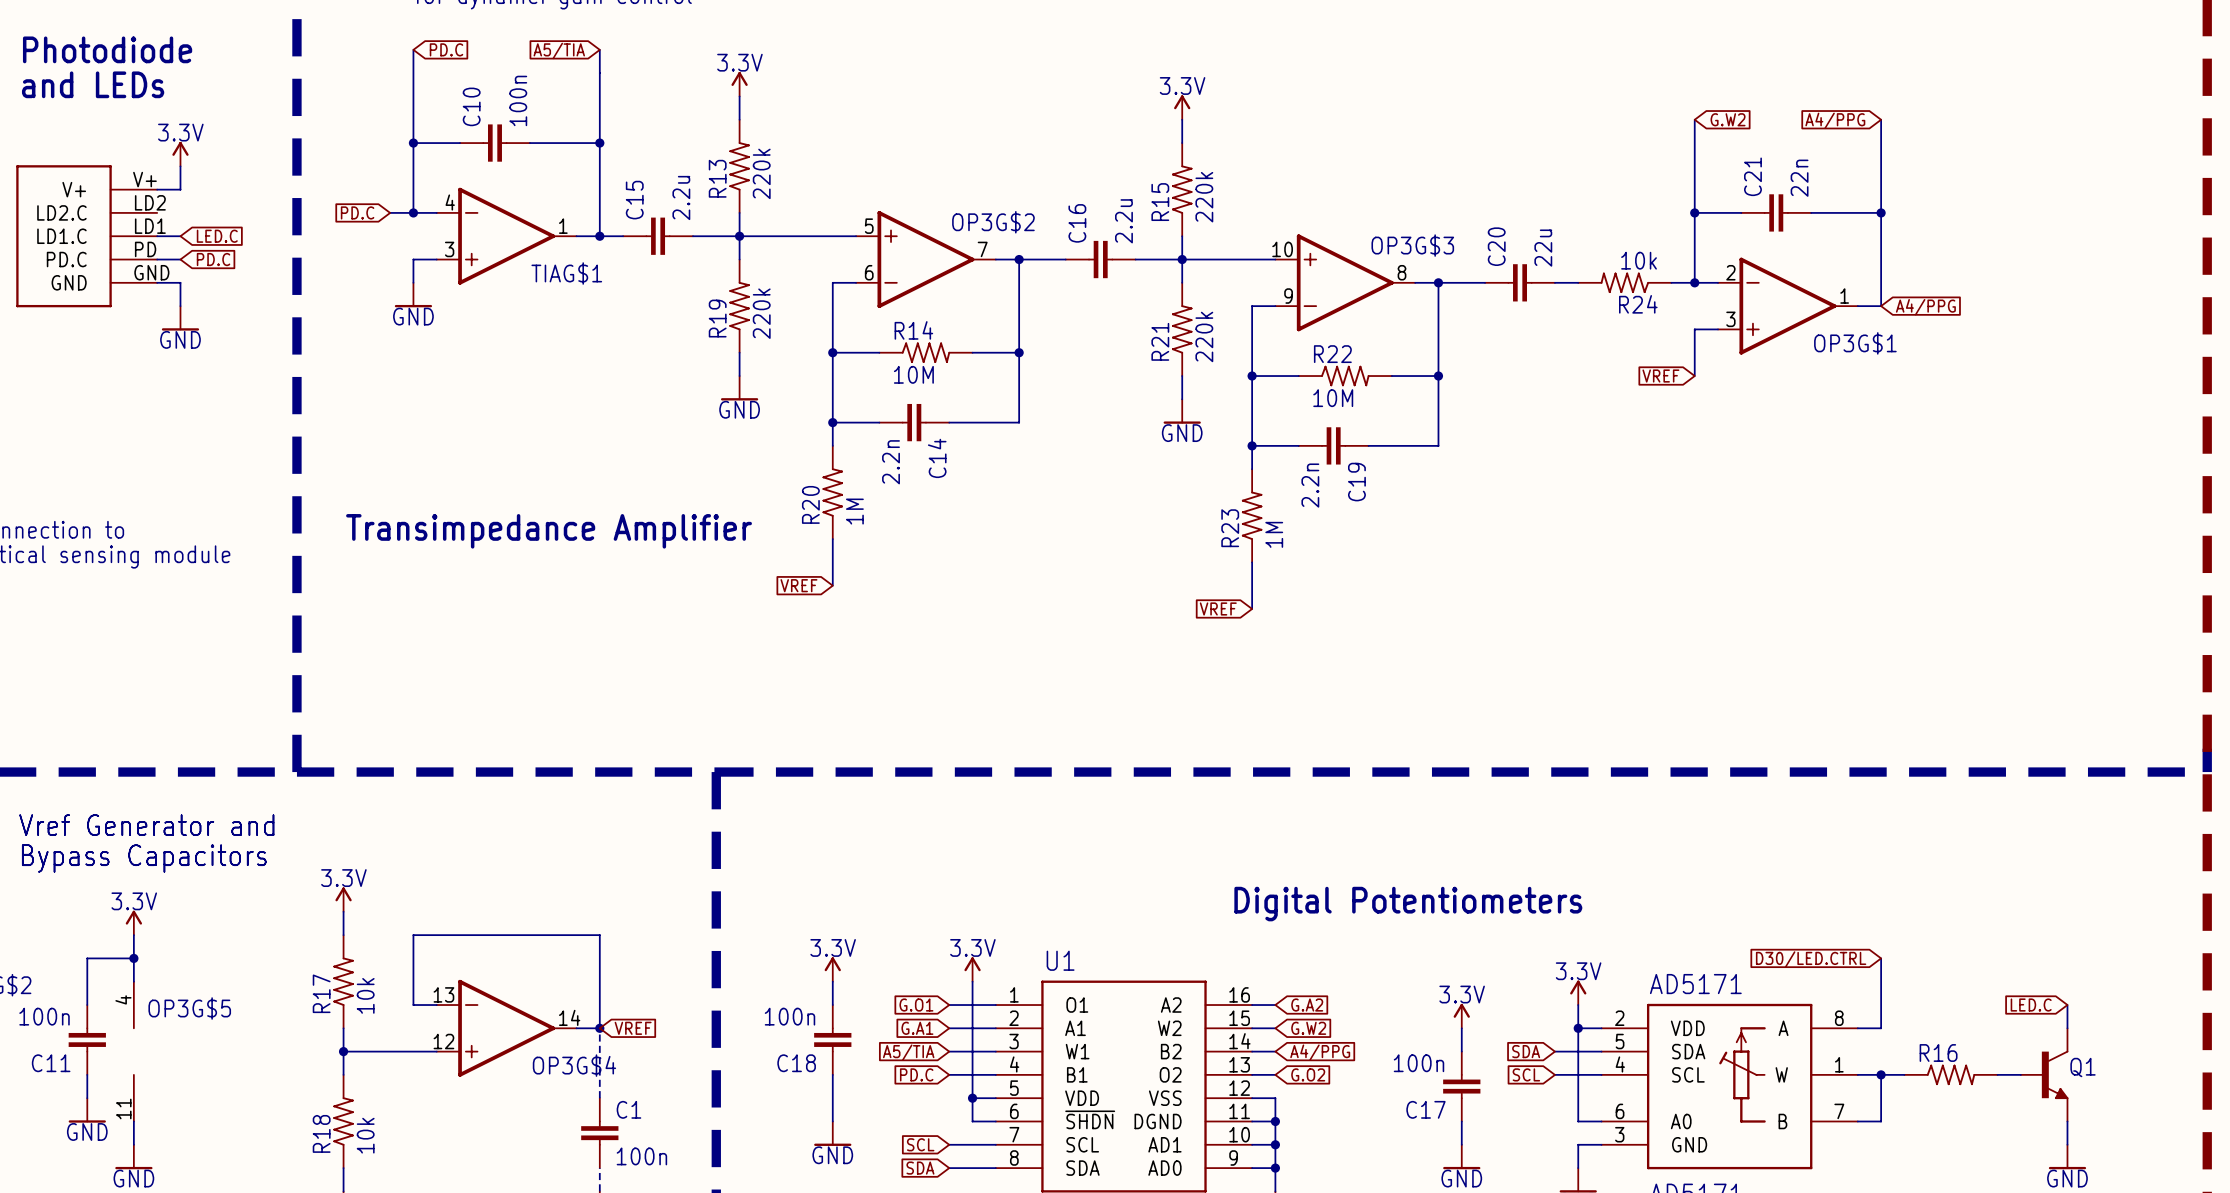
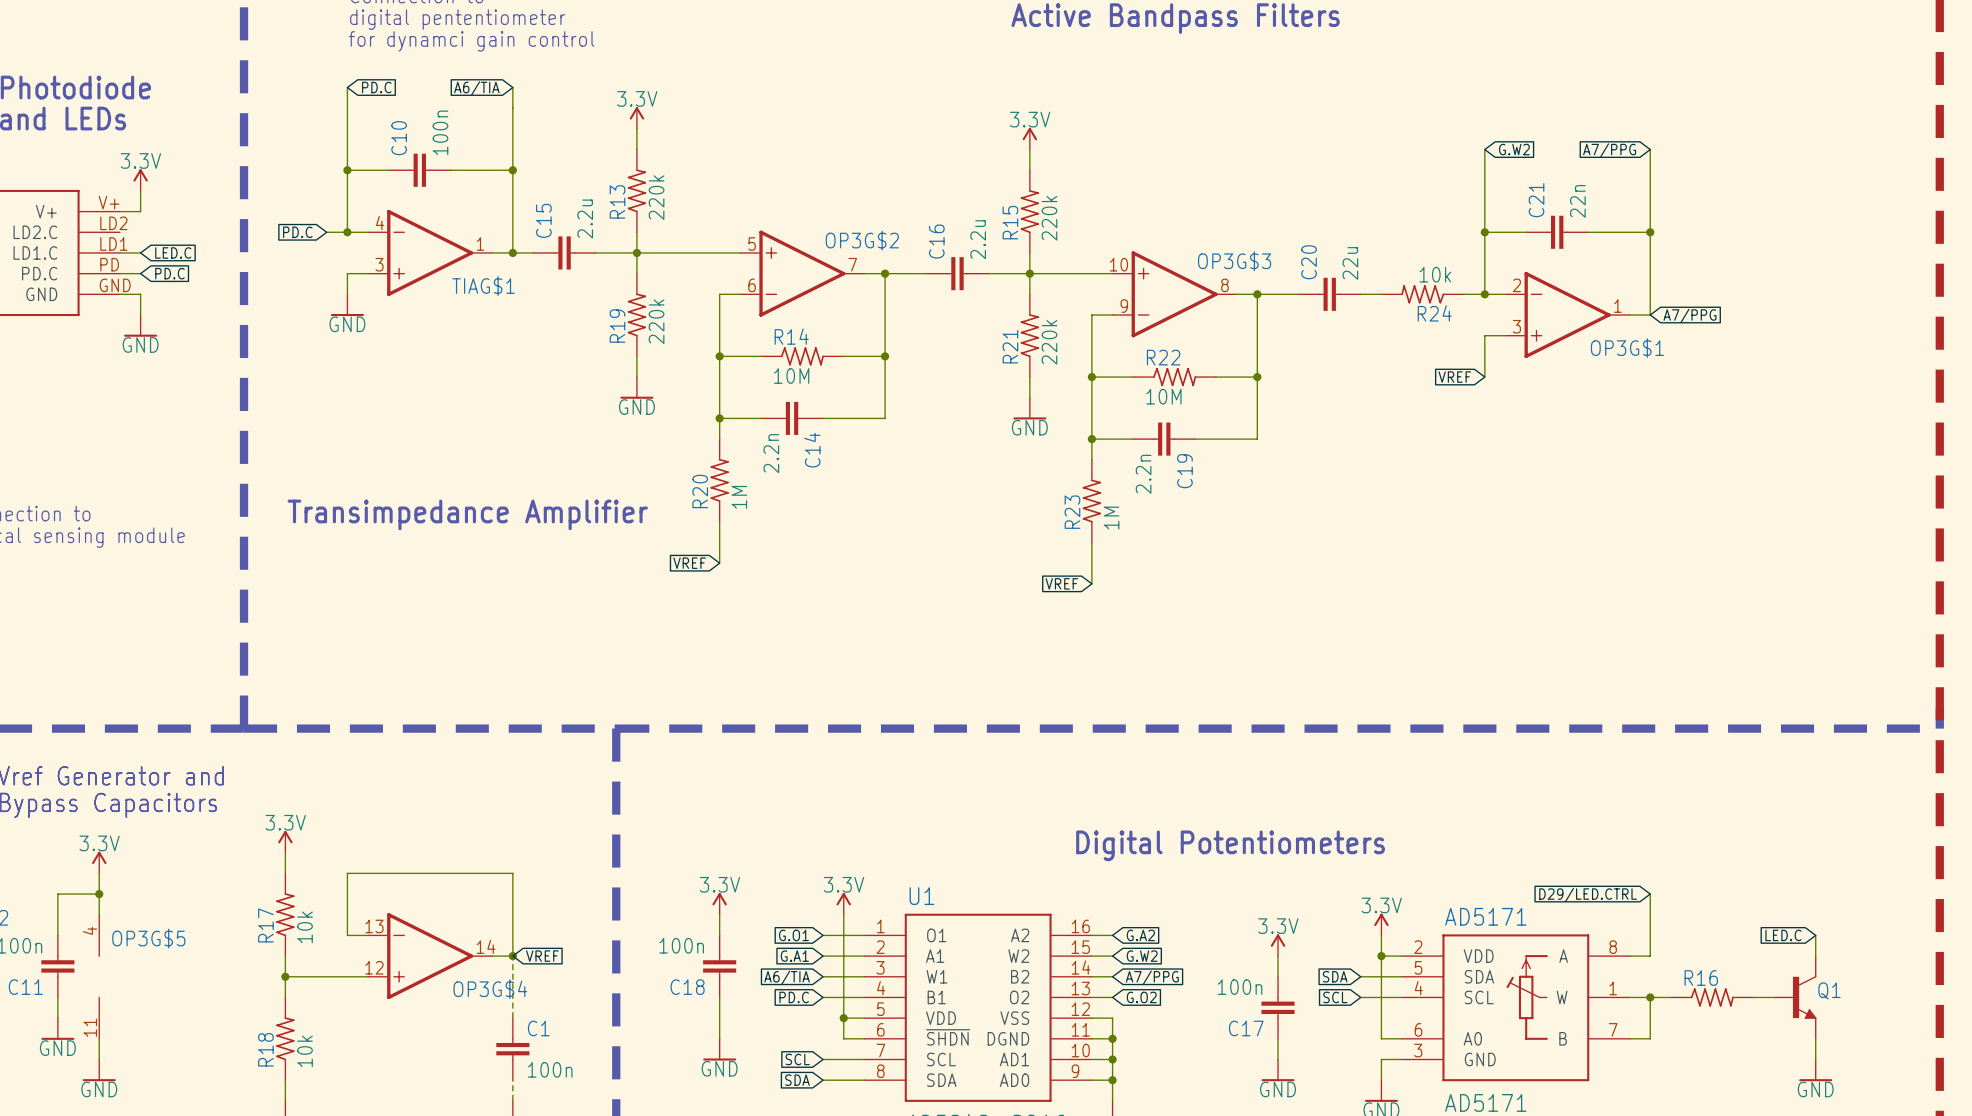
global label: A5/TIA (559, 50) -> A6/TIA (476, 88)
global label: A4/PPG (1835, 120) -> A7/PPG (1609, 150)
global label: A4/PPG (1925, 307) -> A7/PPG (1690, 315)
global label: D30/LED.CTRL (1811, 959) -> D29/LED.CTRL (1588, 895)
global label: A5/TIA (908, 1052) -> A6/TIA (787, 977)
global label: A4/PPG (1320, 1052) -> A7/PPG (1152, 977)

